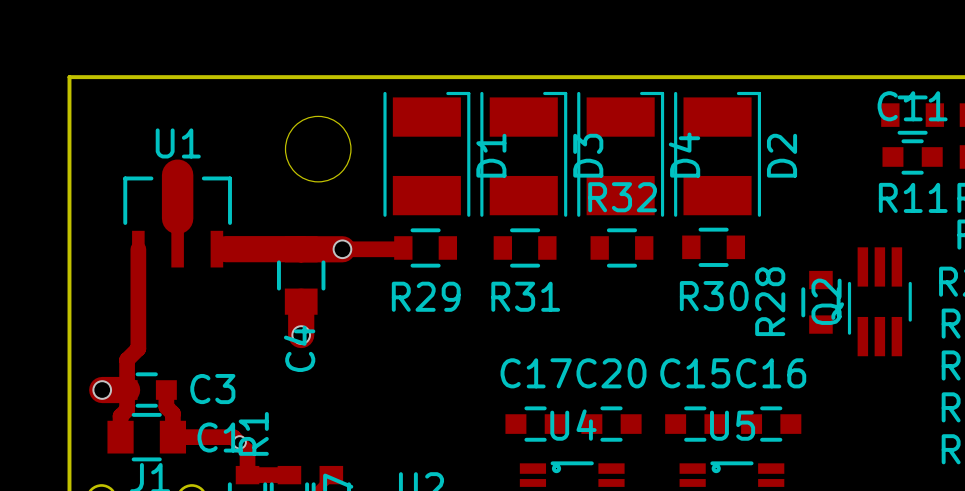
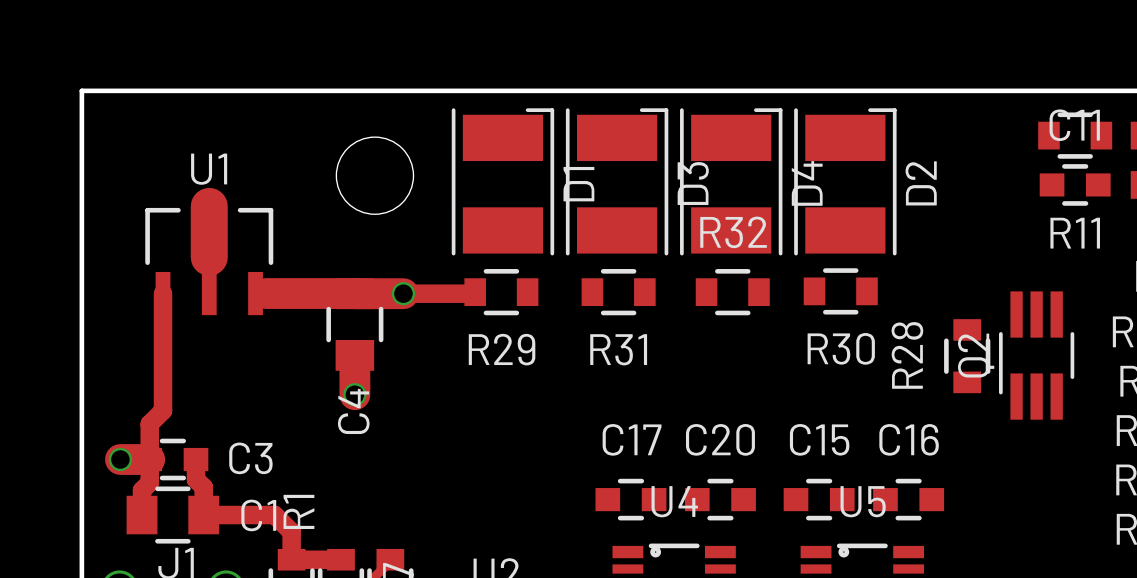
via: (239, 442) -> none

